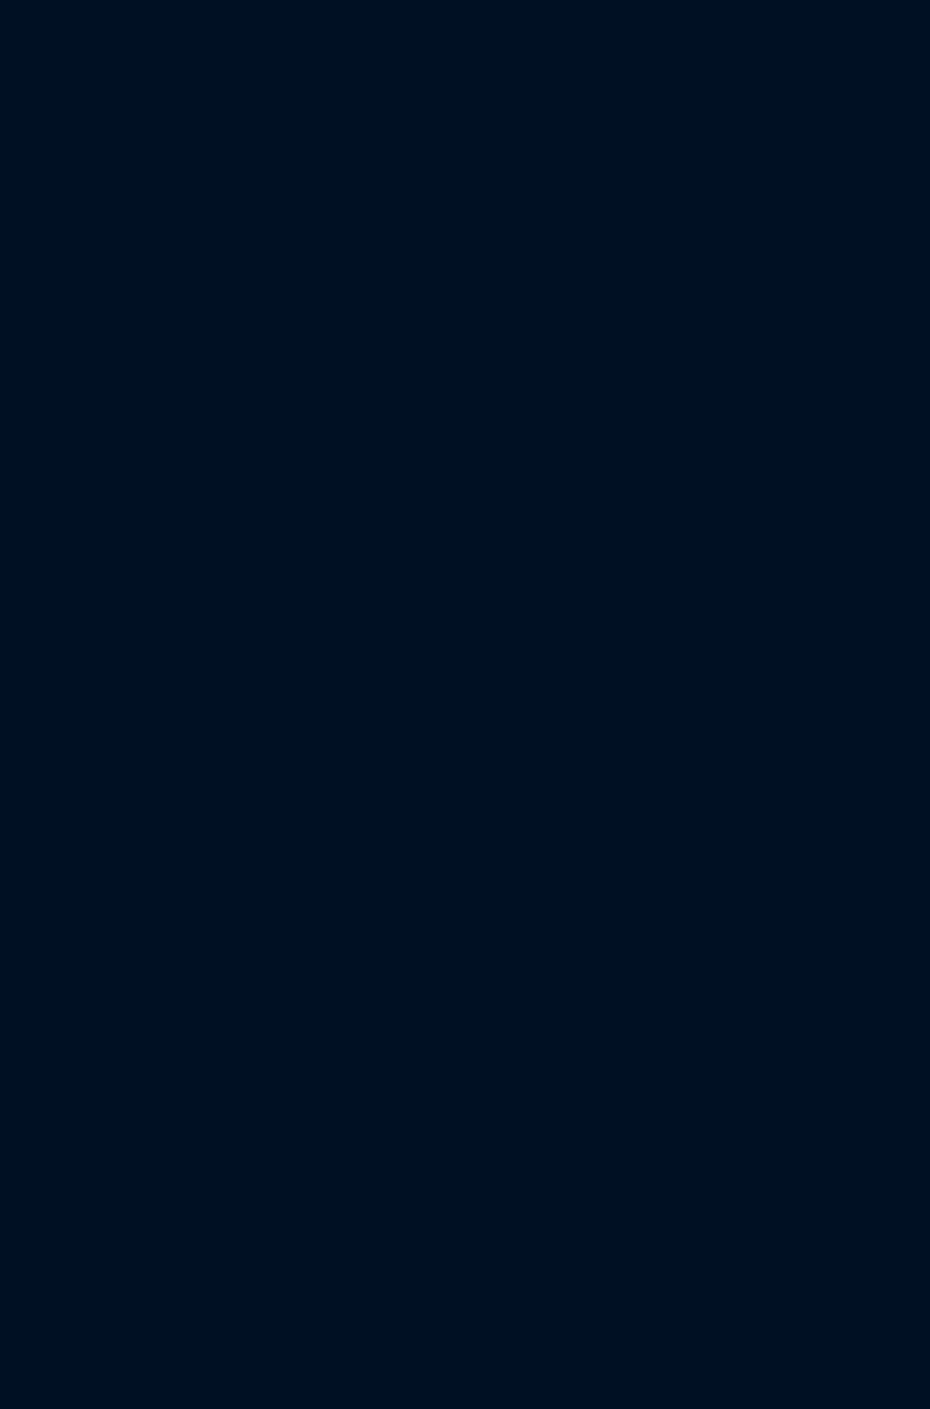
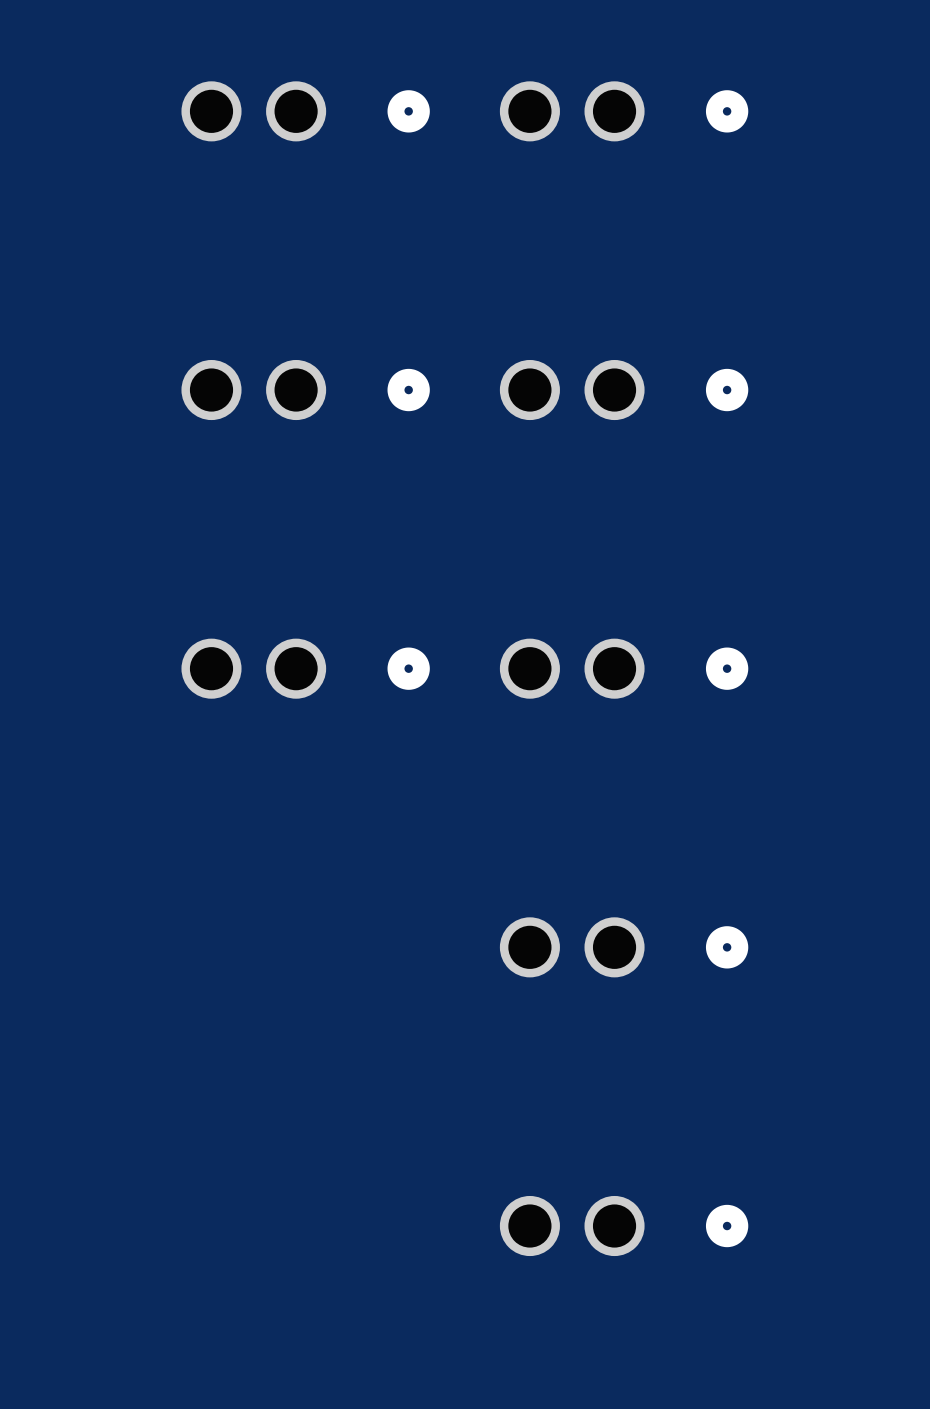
part: none -> (305, 111)
part: none -> (624, 111)
part: none -> (305, 390)
part: none -> (624, 390)
part: none -> (305, 668)
part: none -> (624, 668)
part: none -> (624, 947)
part: none -> (624, 1226)

